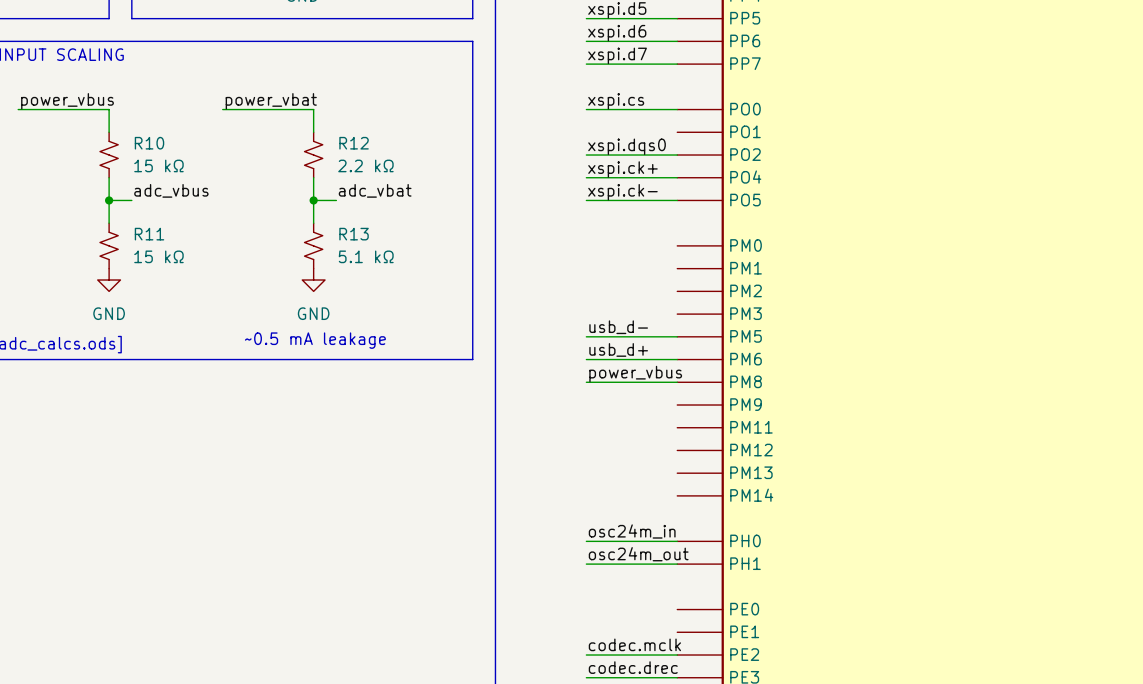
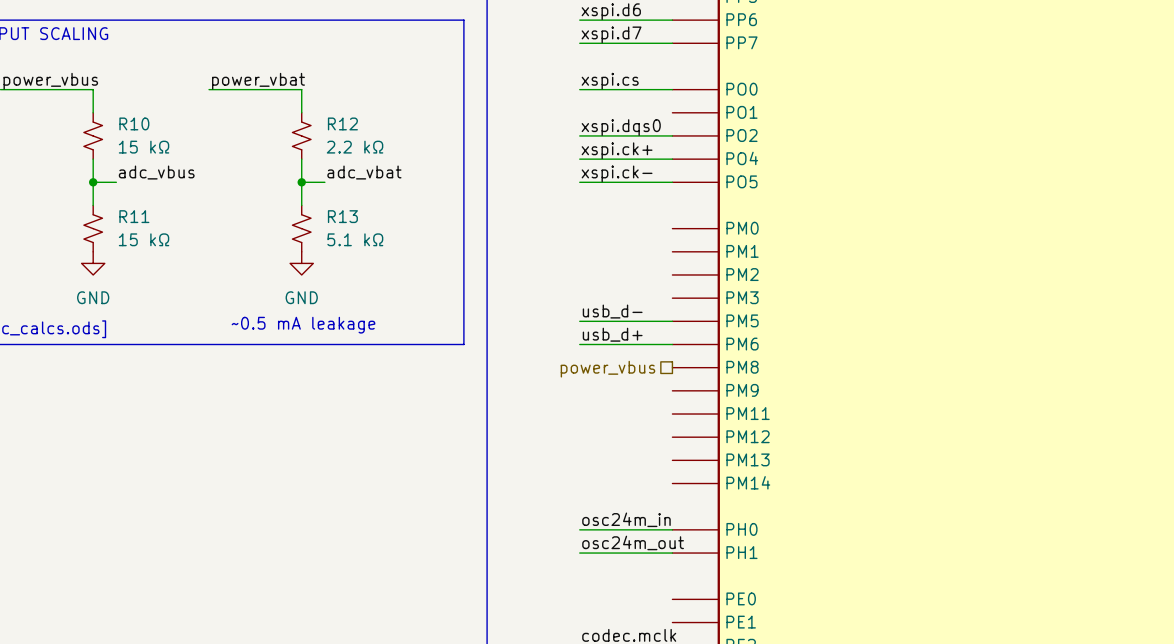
label: power_vbus (635, 374) -> none
wire: (586, 382) (677, 382) -> none
hierarchical label: none -> power_vbus (607, 369)

